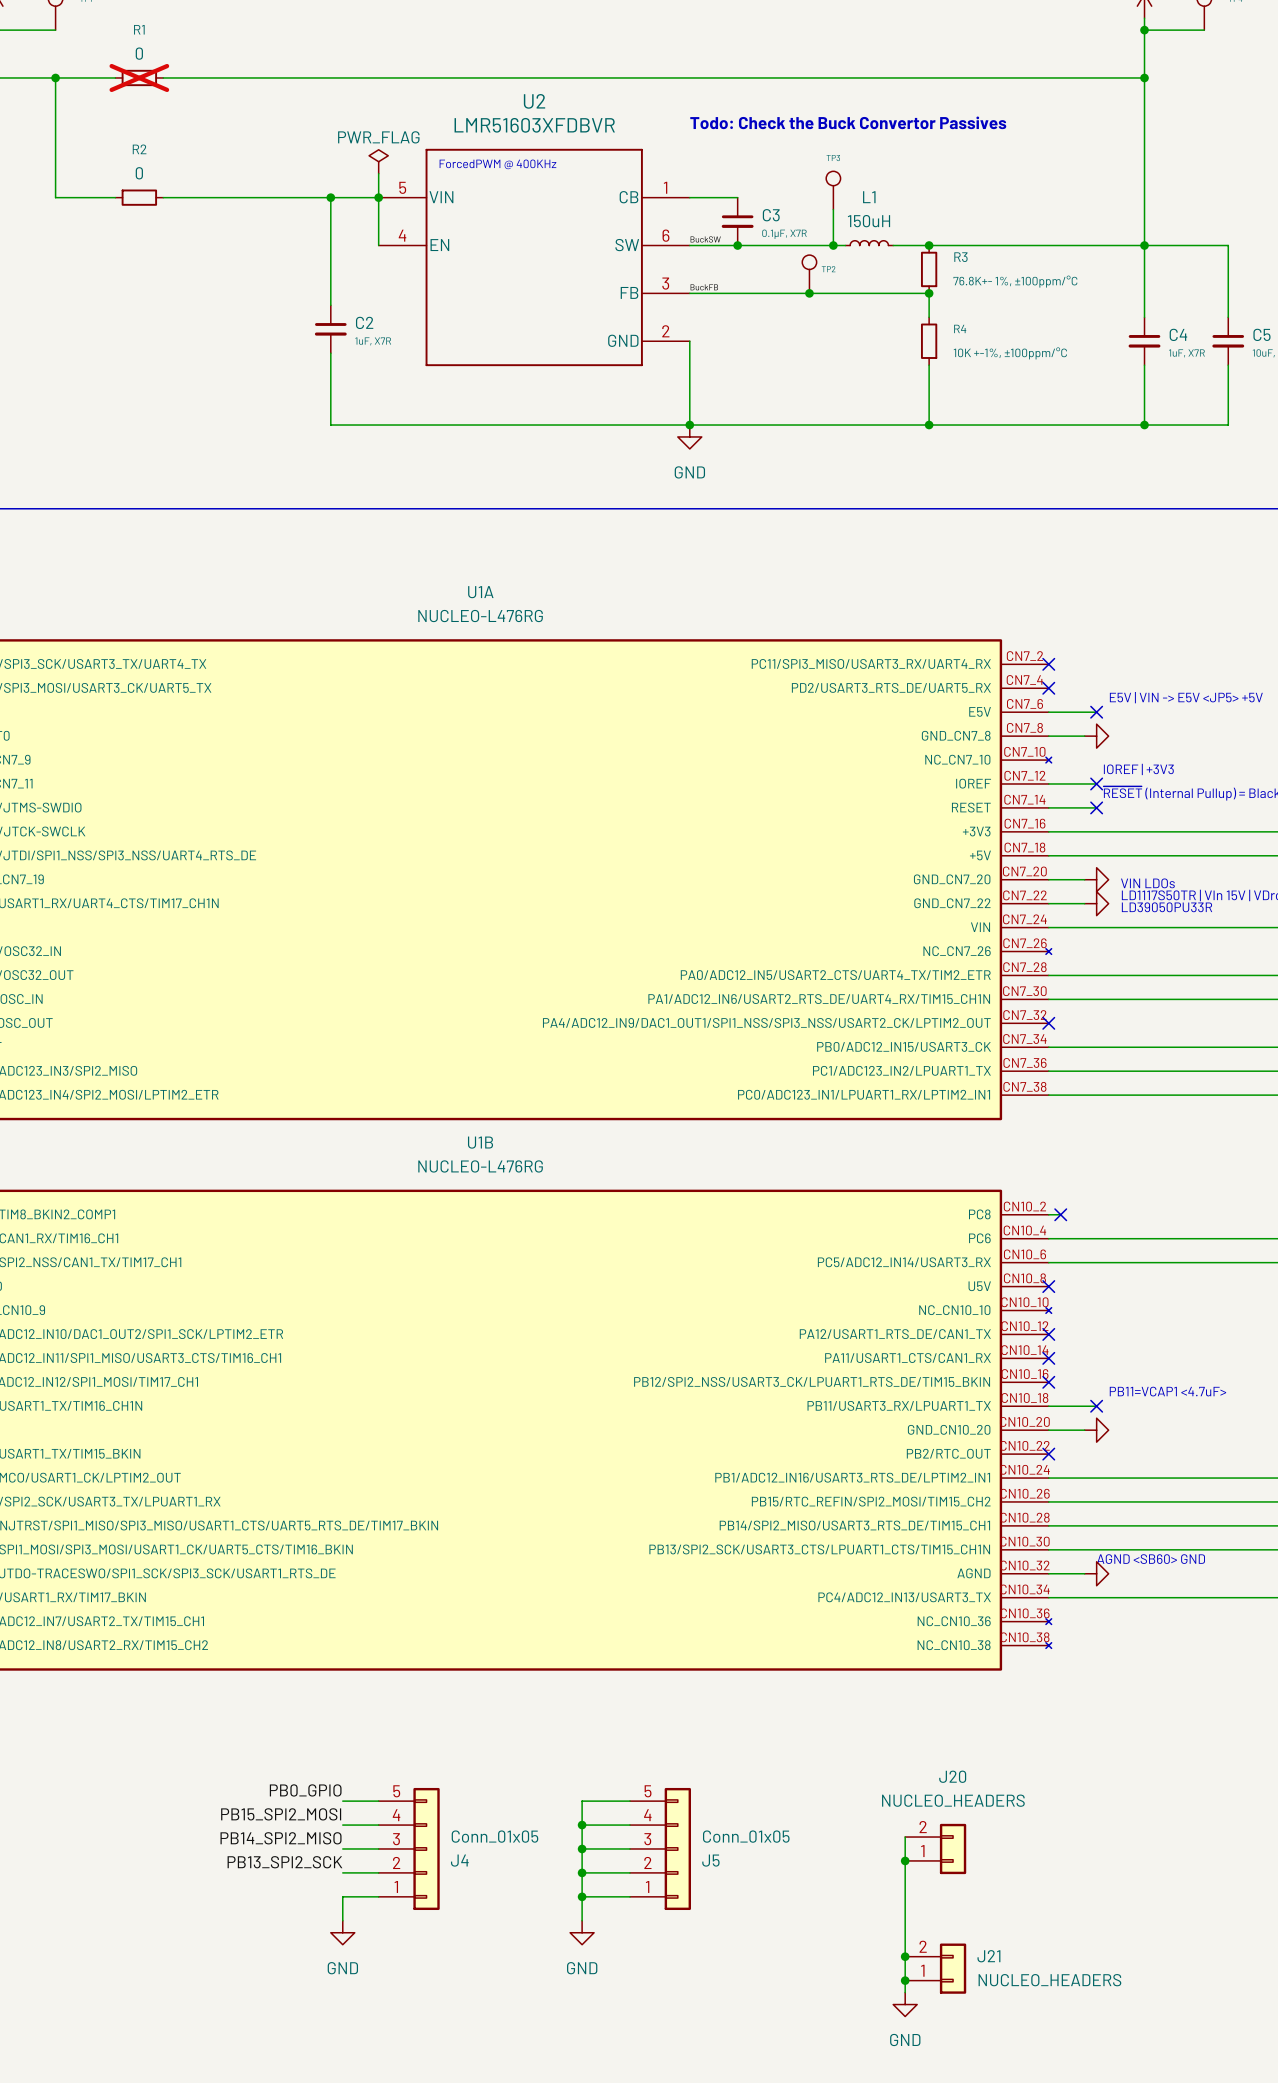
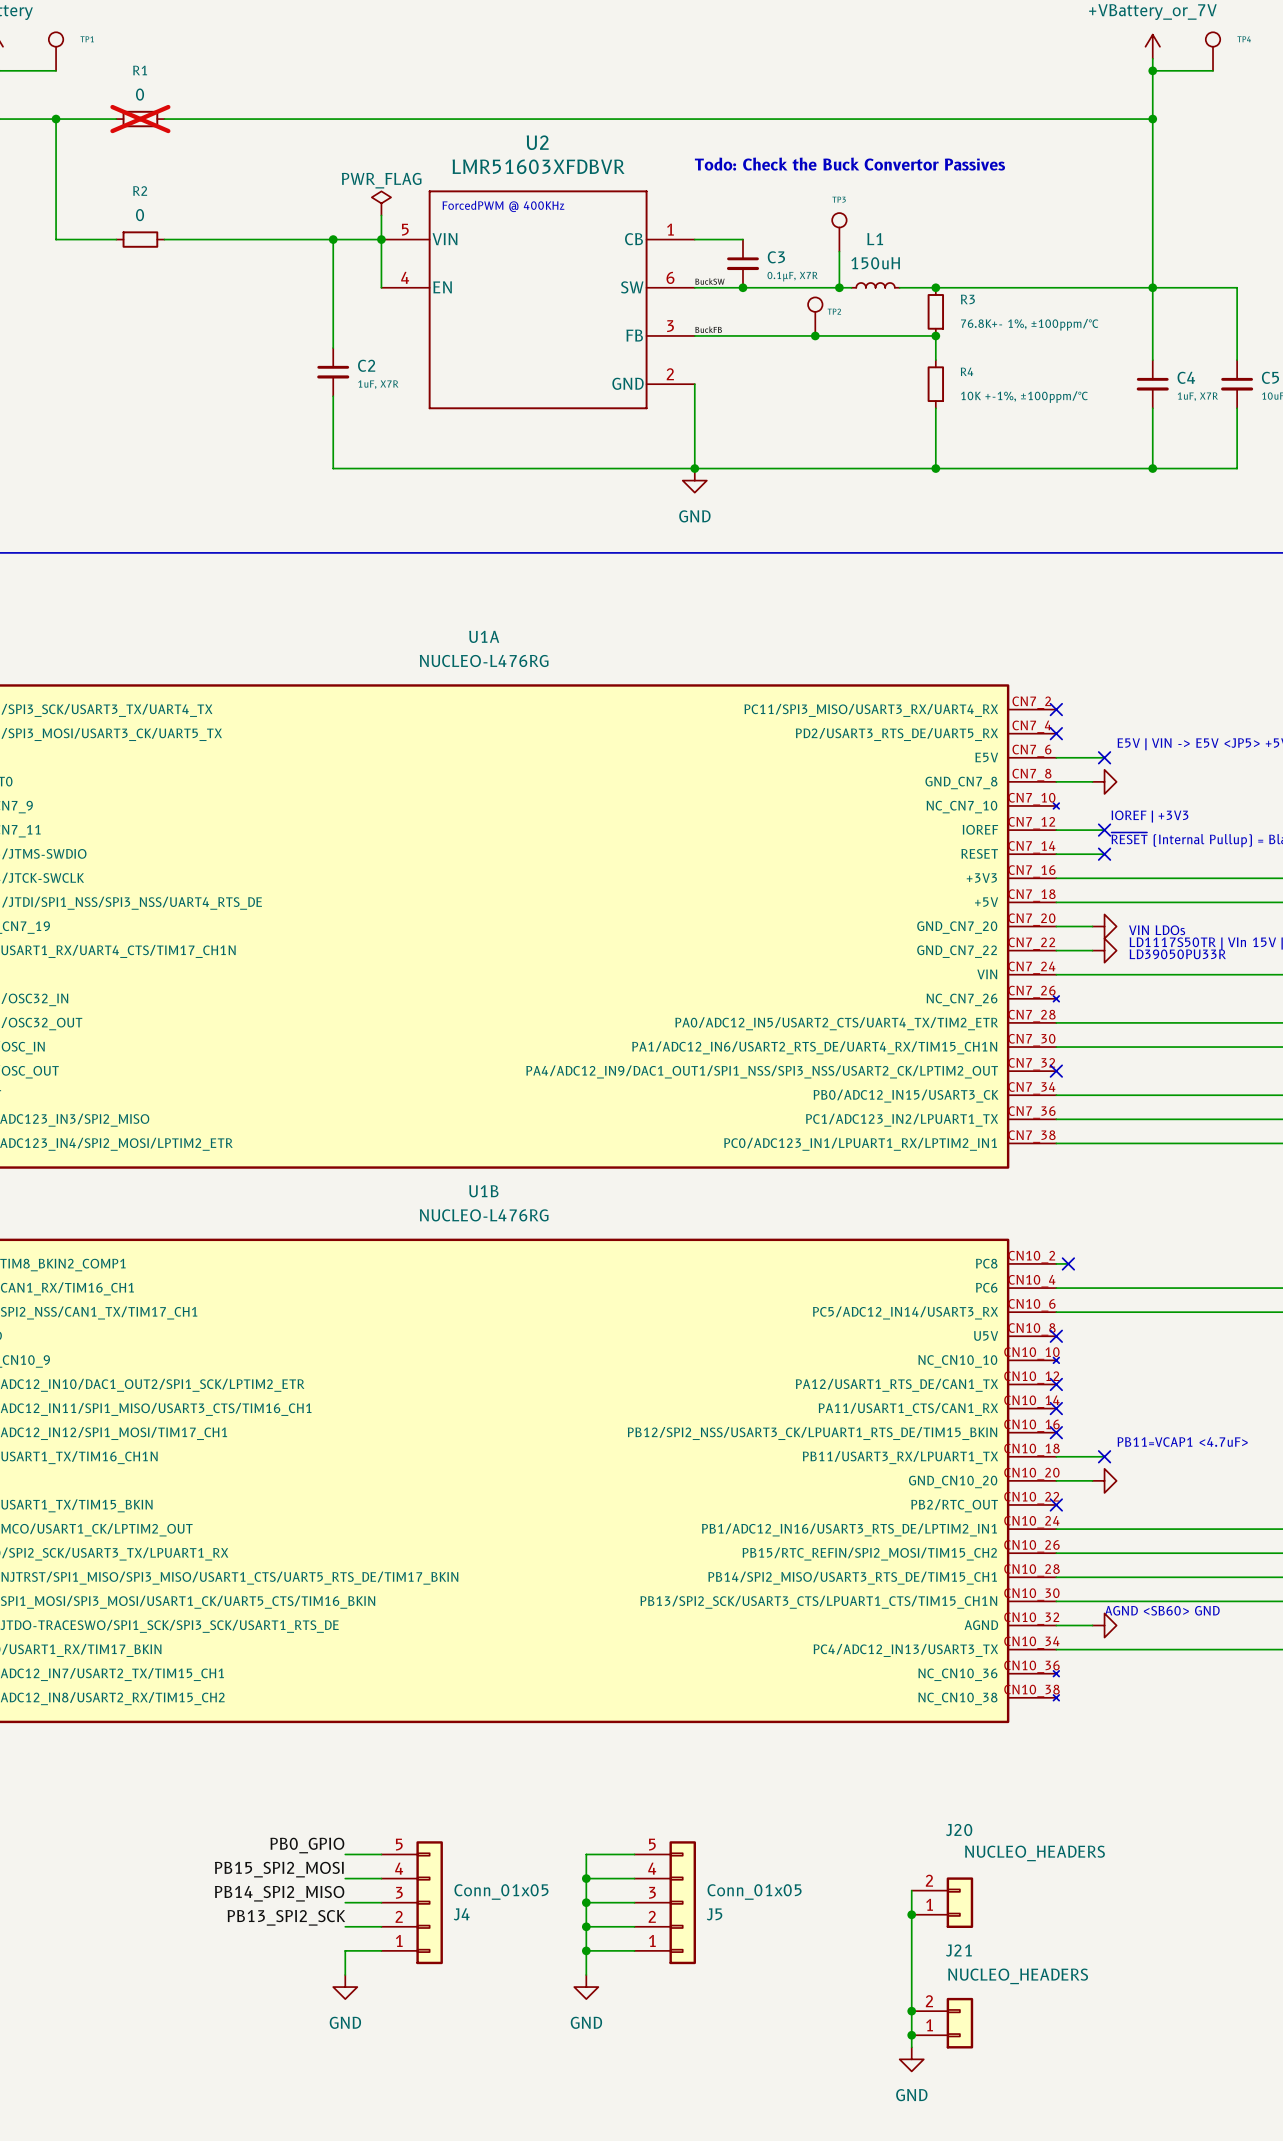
J20 value position: NUCLEO_HEADERS (953, 1800) -> NUCLEO_HEADERS (1034, 1853)
J21 name position: J21 (988, 1956) -> J21 (958, 1950)
J21 value position: NUCLEO_HEADERS (1049, 1980) -> NUCLEO_HEADERS (1018, 1976)

